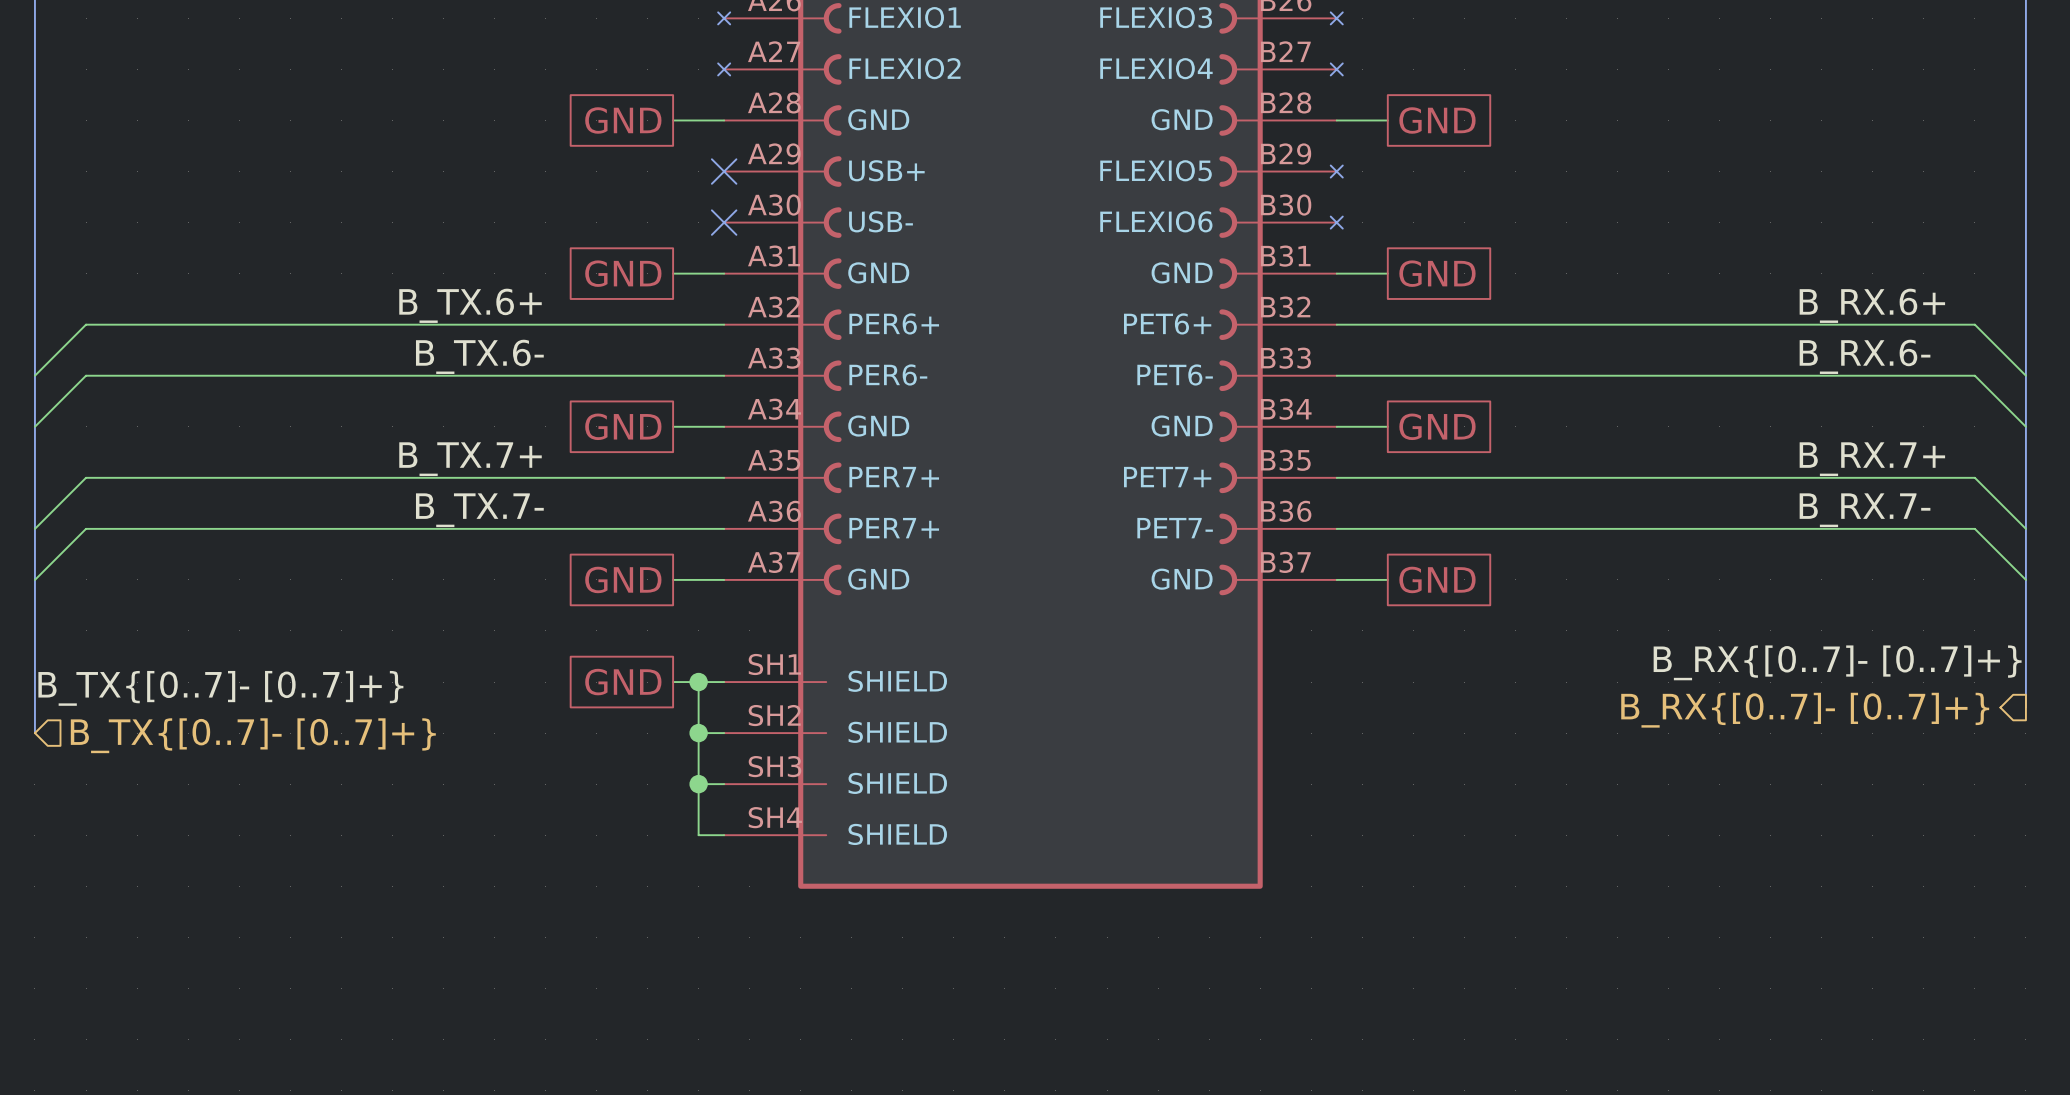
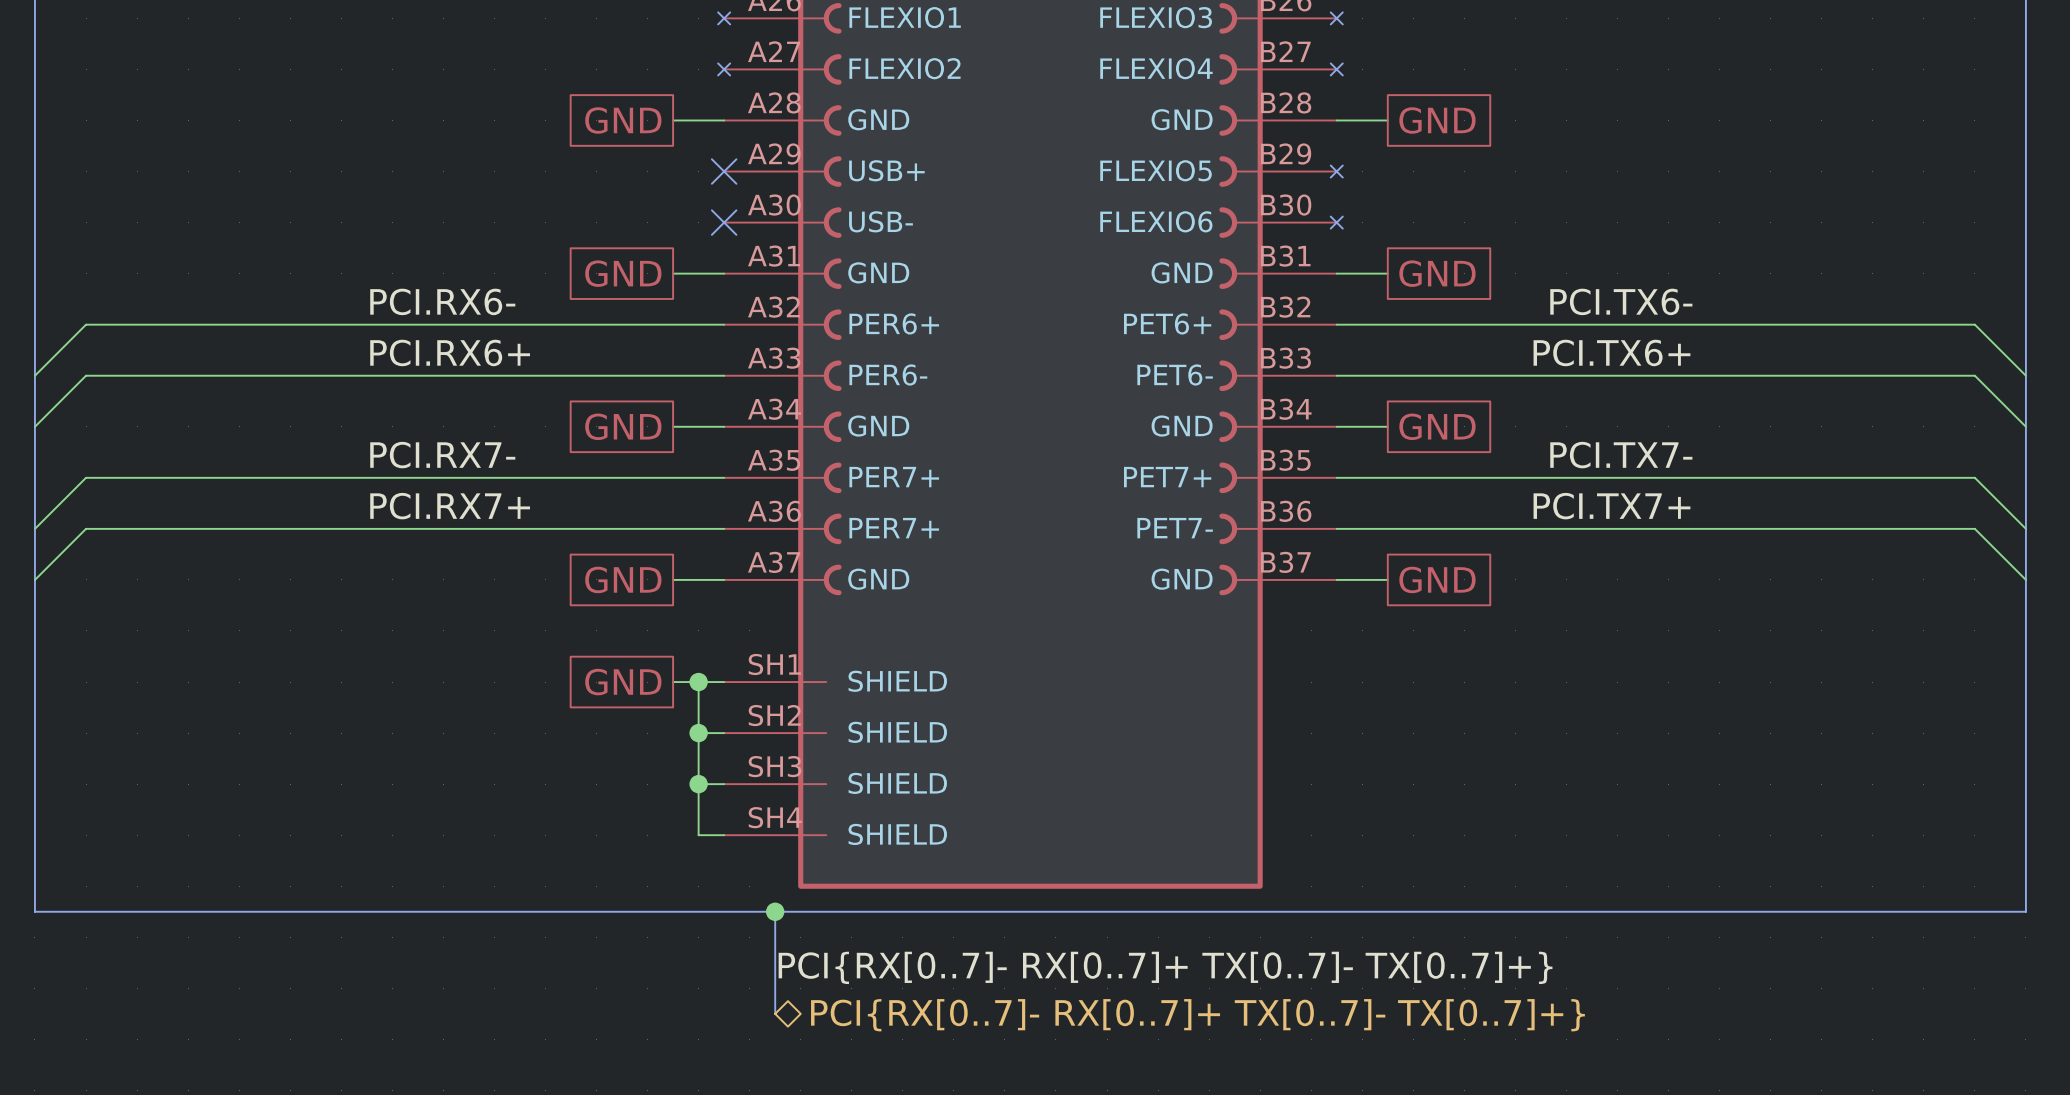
label: none -> PCI.RX6- (442, 301)
label: none -> PCI.TX6- (1621, 301)
label: B_TX.6+ (470, 305) -> none
label: B_RX.6+ (1872, 305) -> none
label: none -> PCI.RX6+ (450, 352)
label: none -> PCI.TX6+ (1611, 352)
label: B_TX.6- (479, 356) -> none
label: B_RX.6- (1865, 356) -> none
label: none -> PCI.RX7- (442, 455)
label: none -> PCI.TX7- (1621, 455)
label: B_TX.7+ (470, 459) -> none
label: B_RX.7+ (1872, 459) -> none
label: none -> PCI.RX7+ (450, 506)
label: none -> PCI.TX7+ (1611, 506)
label: B_TX.7- (479, 510) -> none
label: B_RX.7- (1865, 510) -> none
label: B_RX{[0..7]- [0..7]+} (1837, 662) -> none
label: B_TX{[0..7]- [0..7]+} (220, 688) -> none
bus: none -> (2025, 707) (2025, 911) (34, 911) (34, 733)
hierarchical label: B_RX{[0..7]- [0..7]+} (1805, 710) -> none
hierarchical label: B_TX{[0..7]- [0..7]+} (253, 735) -> none
bus: none -> (775, 911) (775, 1013)
junction: none -> (775, 911)
label: none -> PCI{RX[0..7]- RX[0..7]+ TX[0..7]- TX[0..7]+} (1165, 967)
hierarchical label: none -> PCI{RX[0..7]- RX[0..7]+ TX[0..7]- TX[0..7]+} (1197, 1015)

